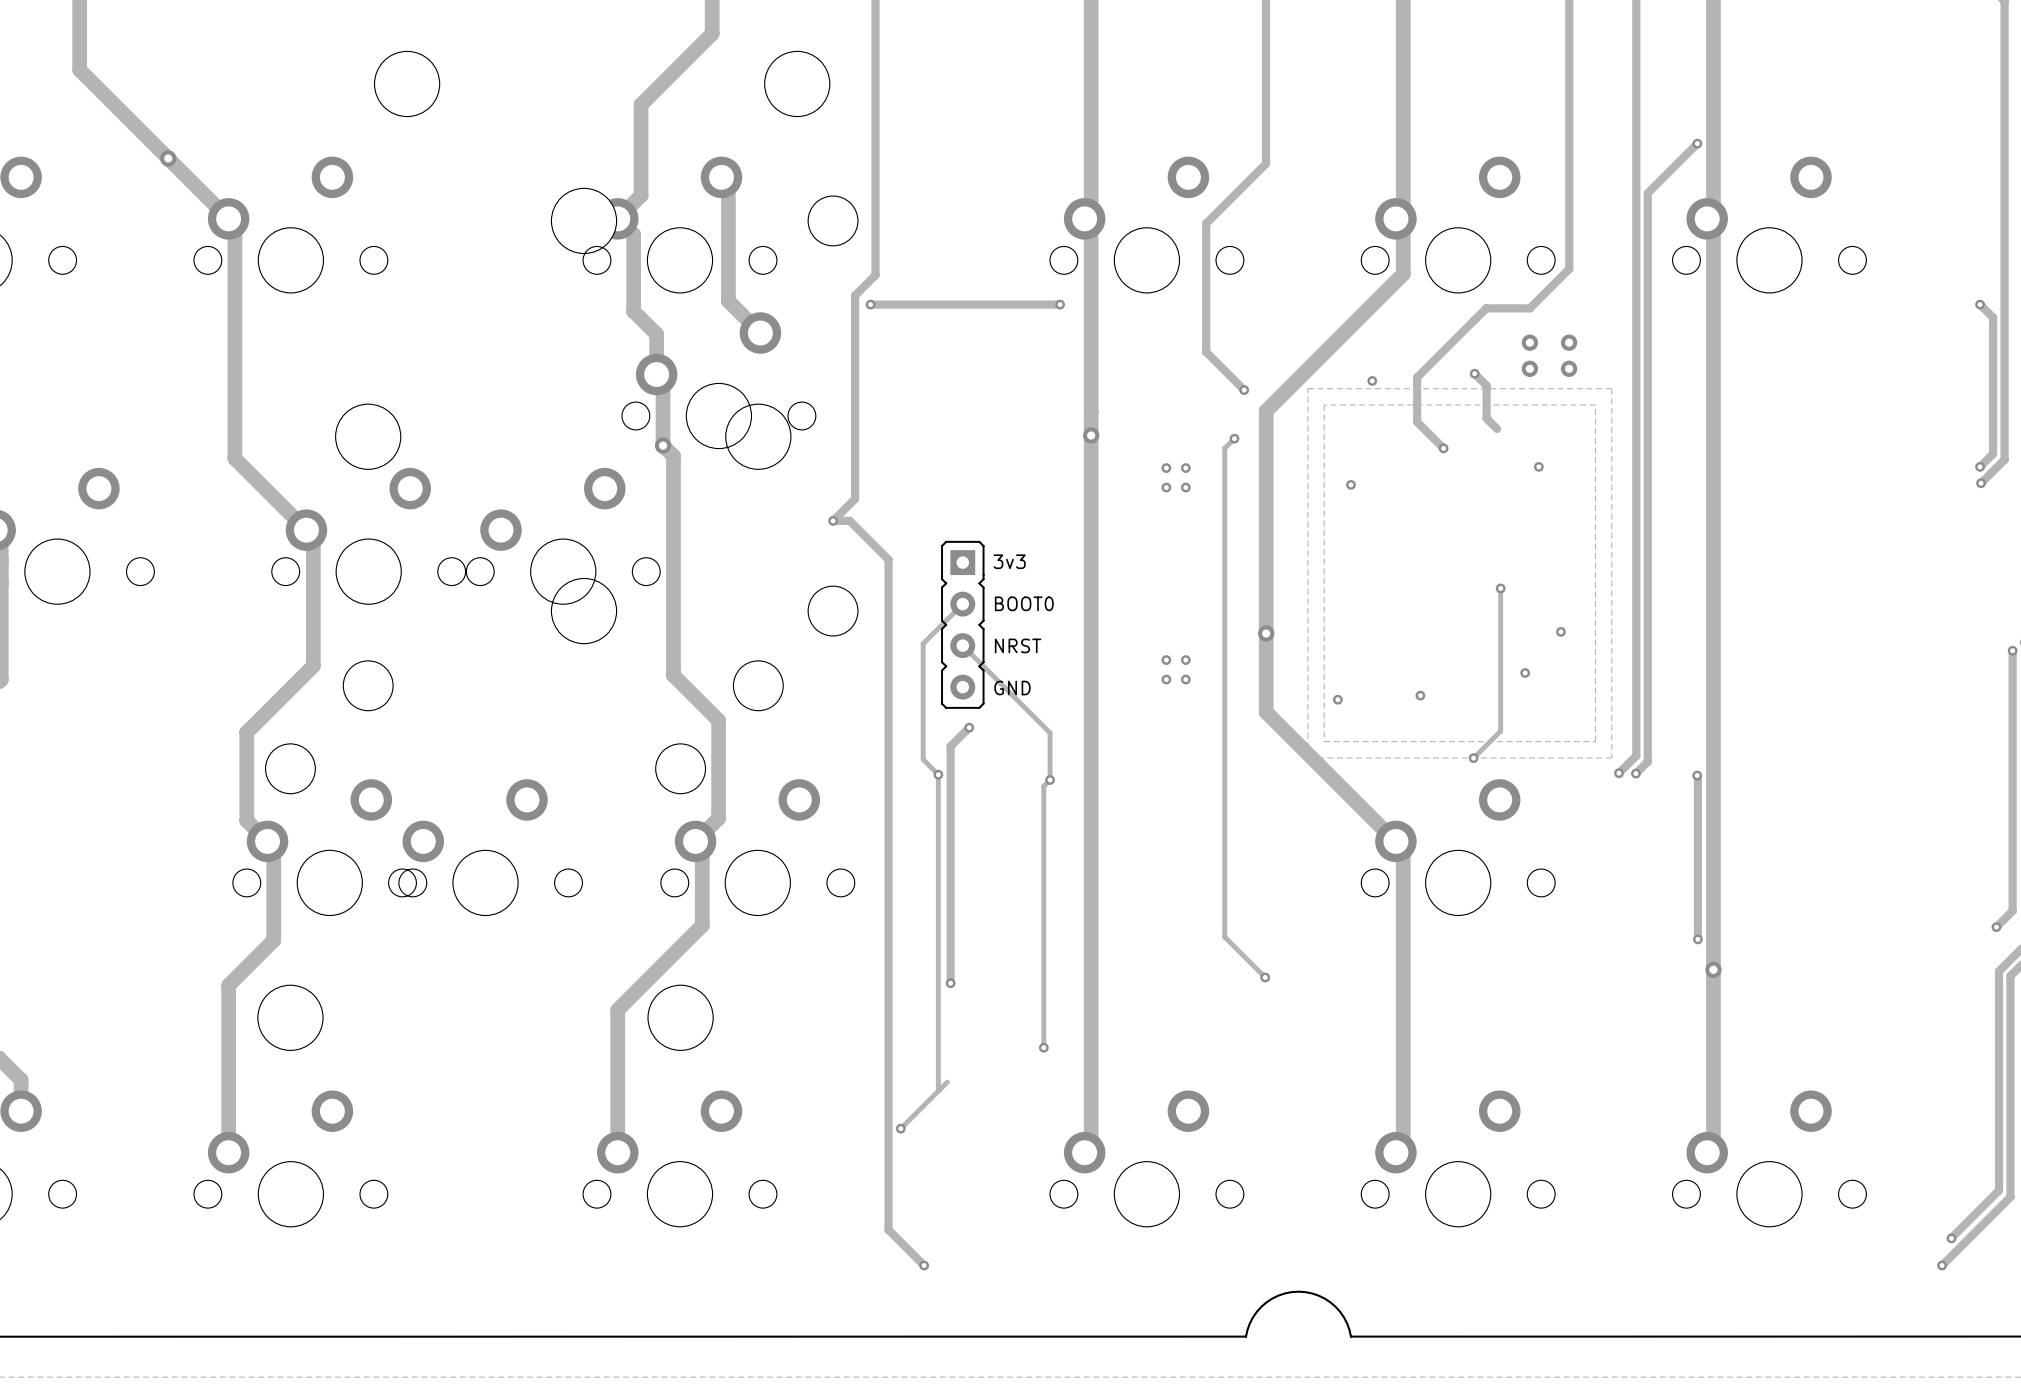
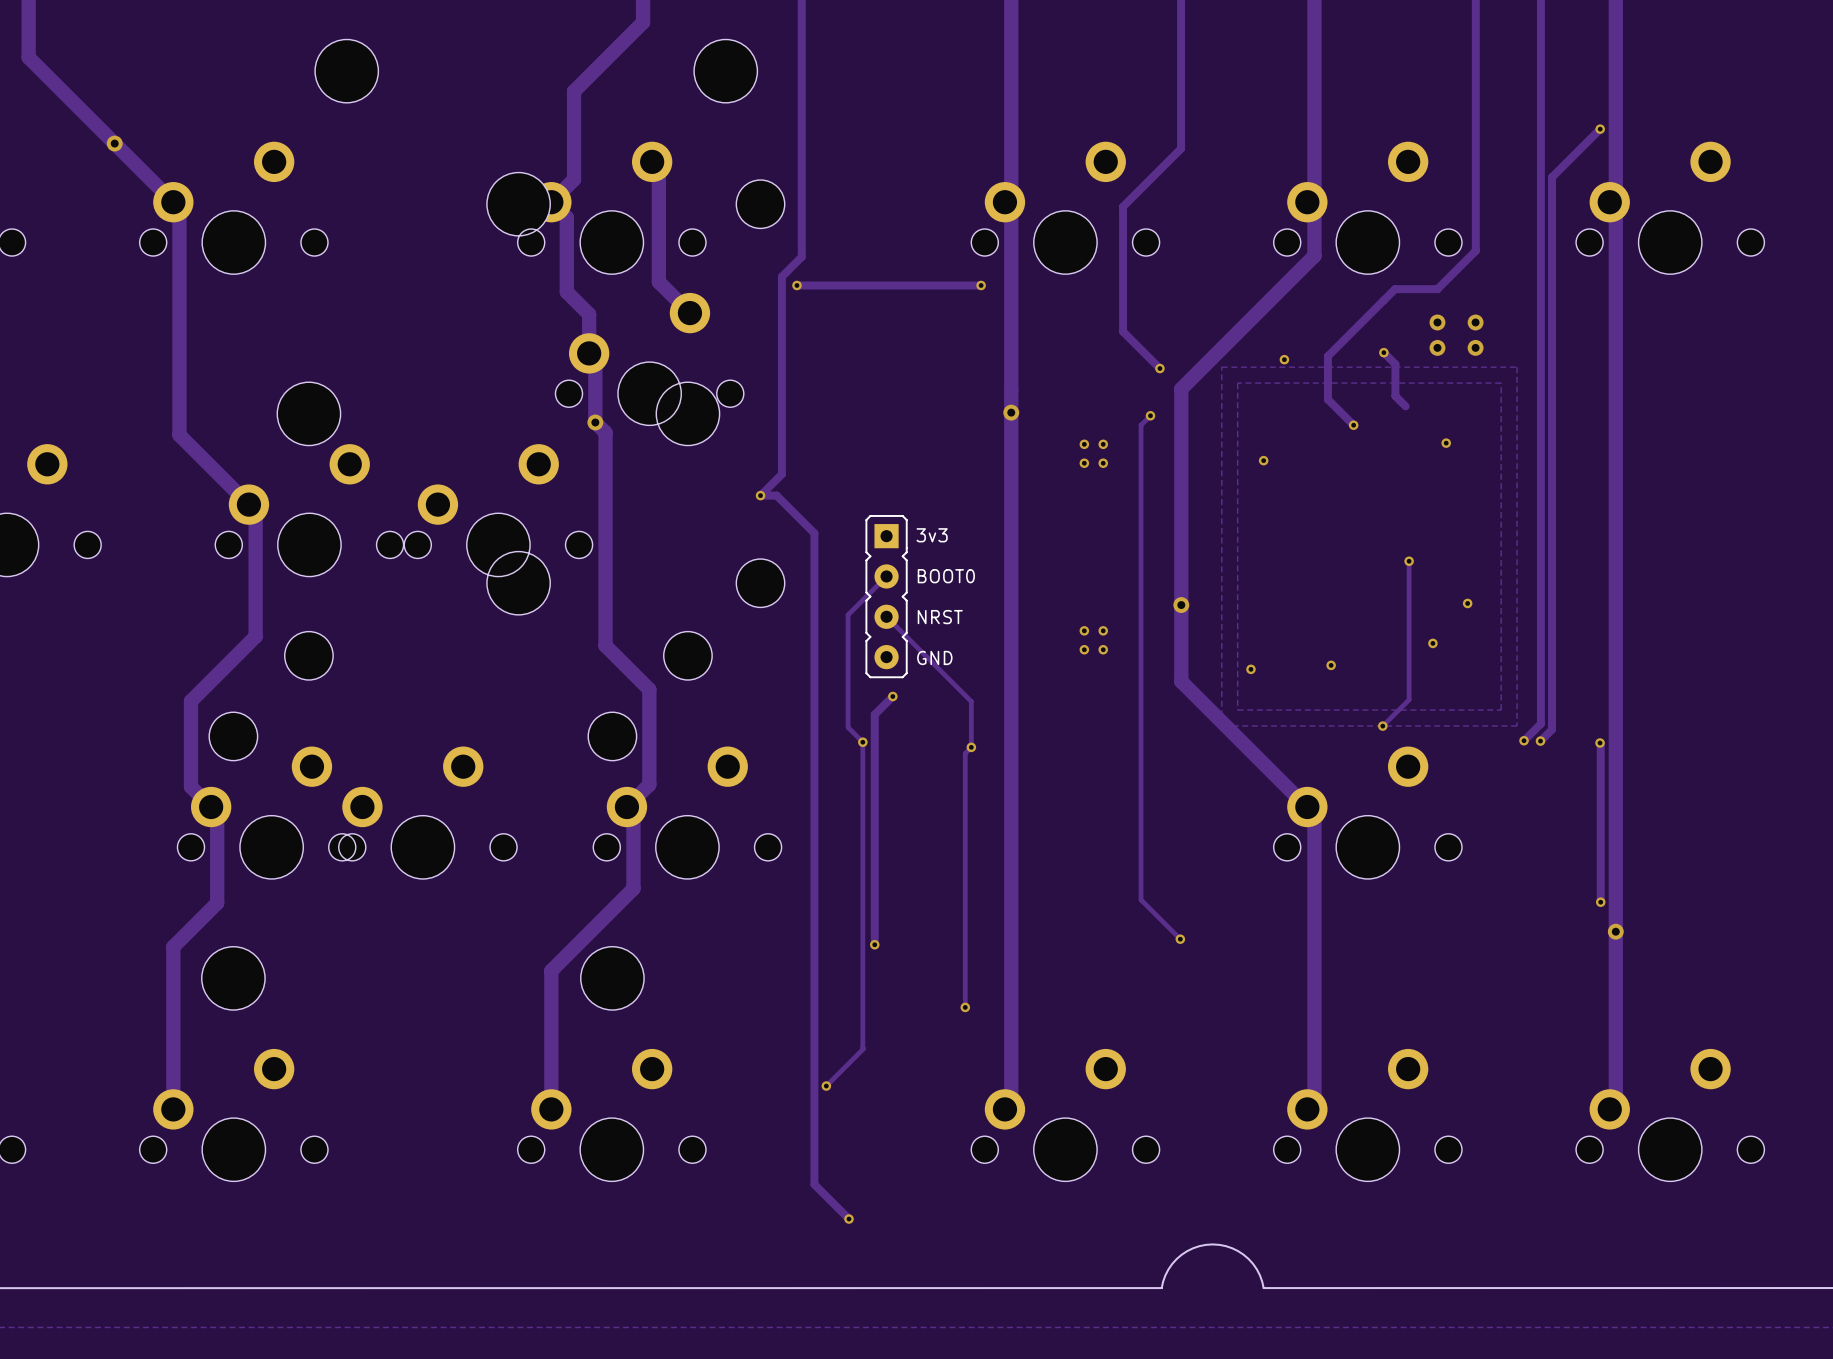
track: (947, 1082) (938, 1091) -> none

